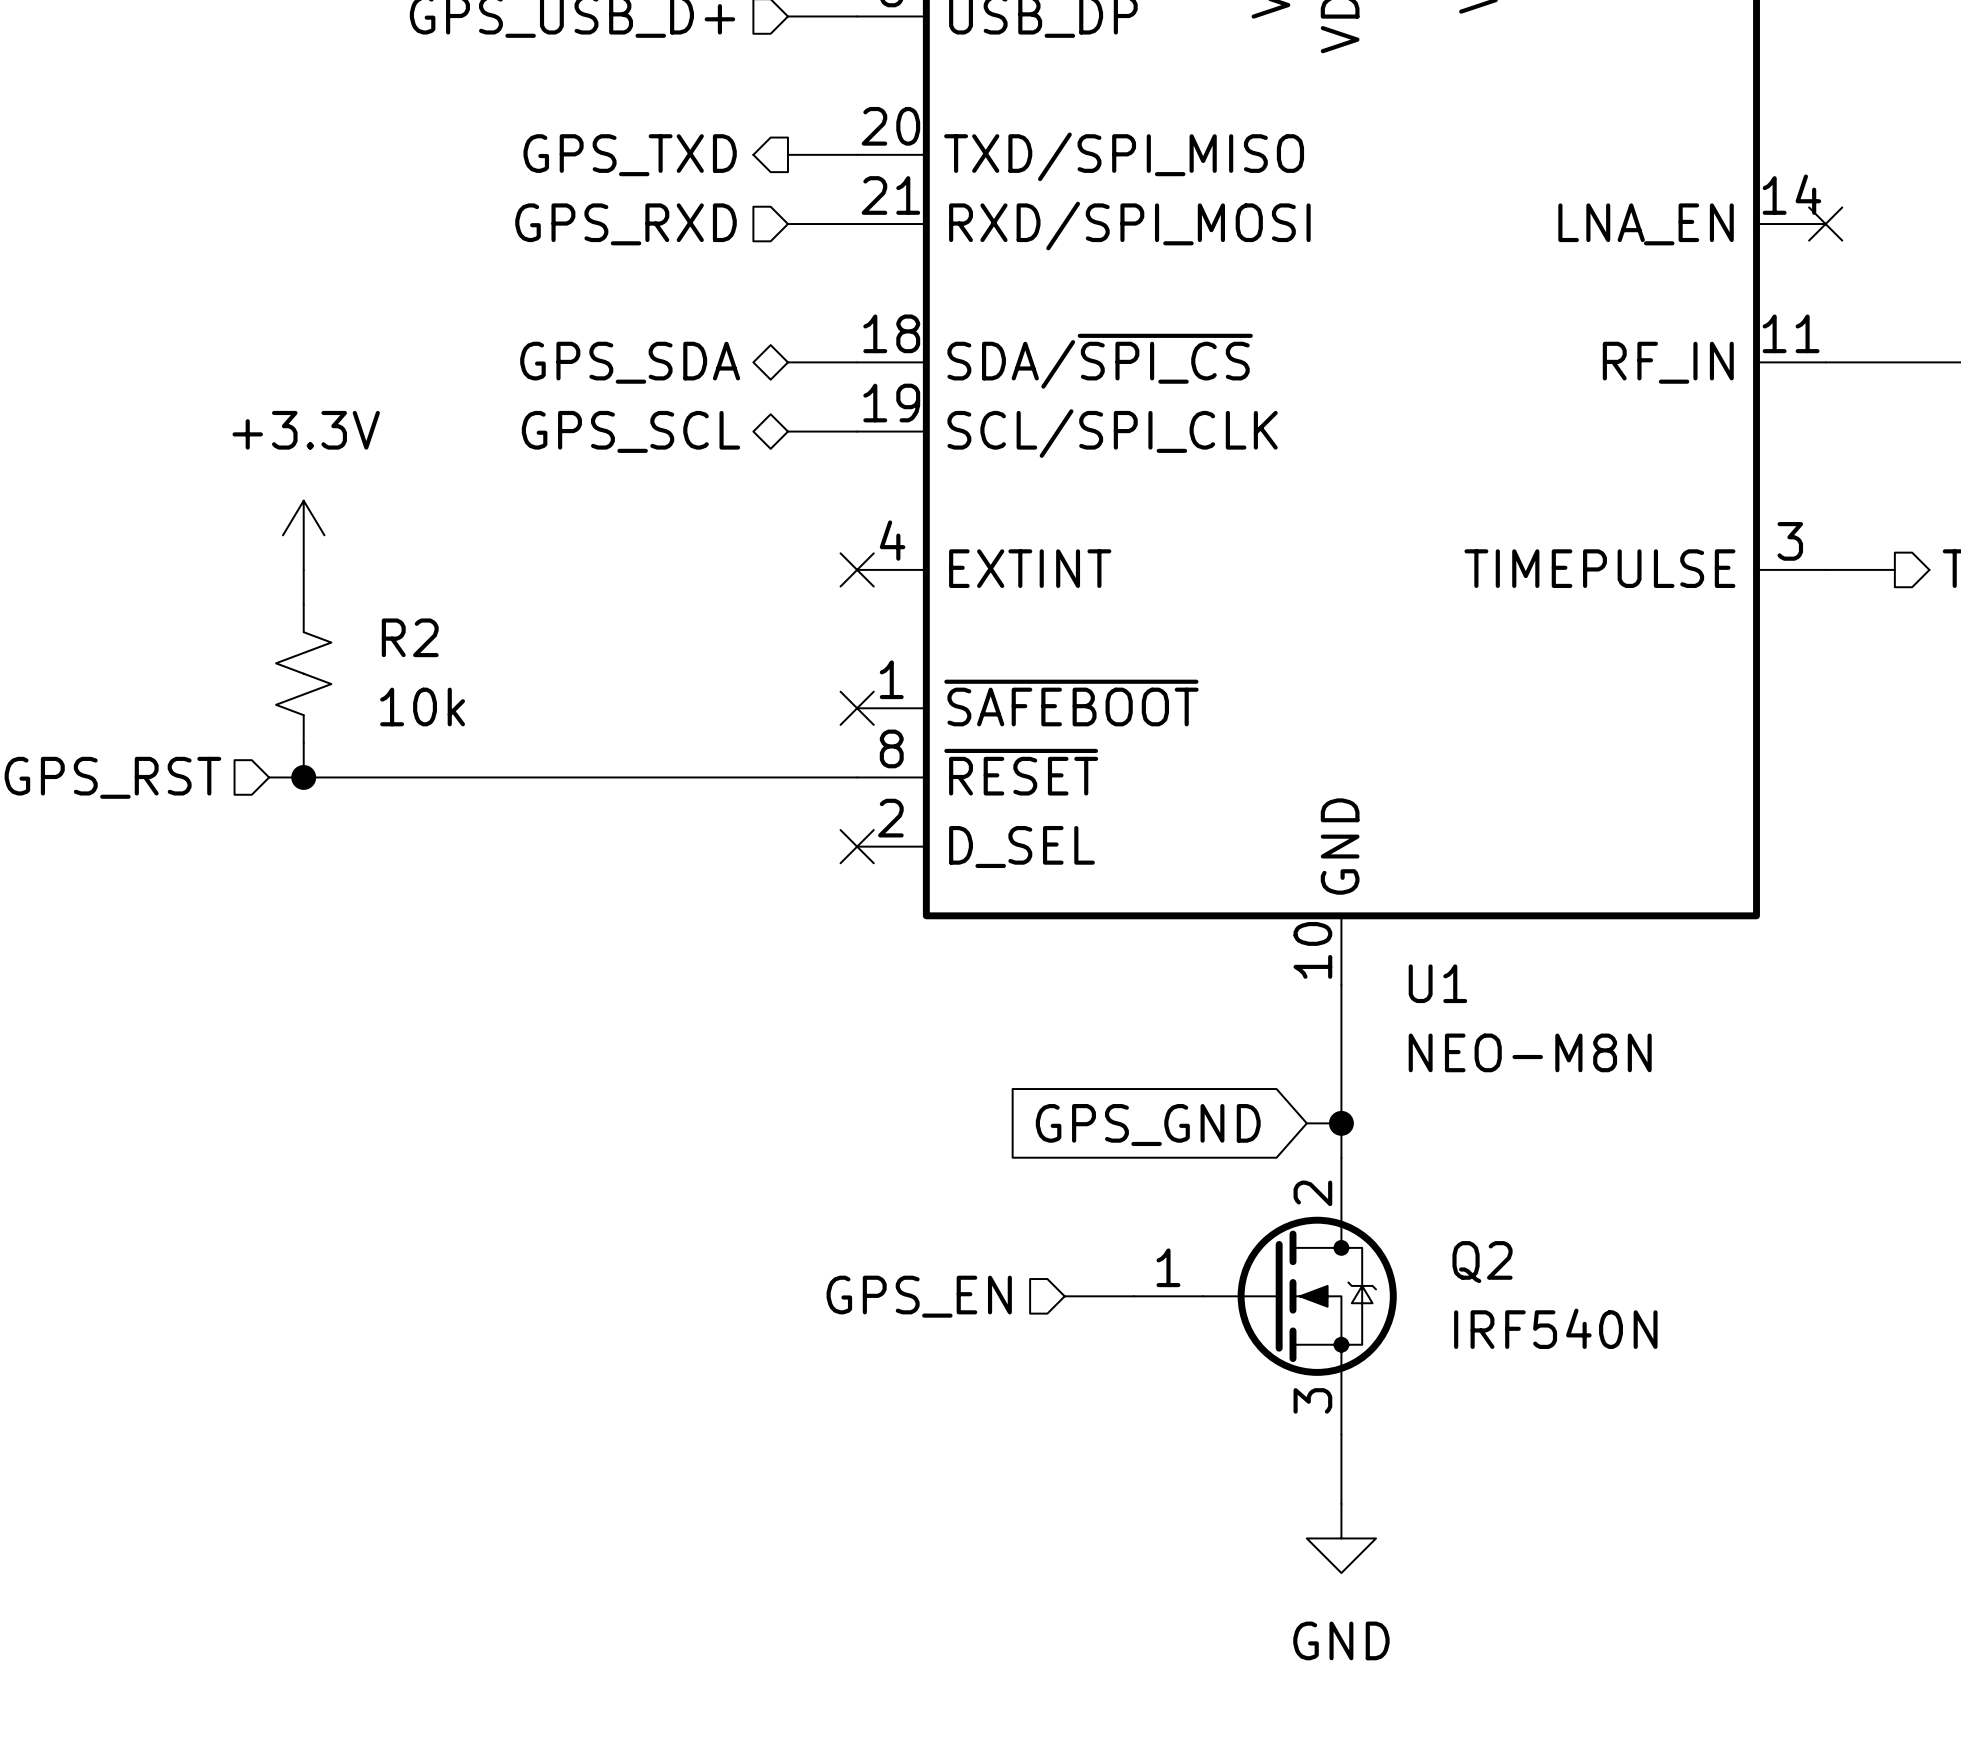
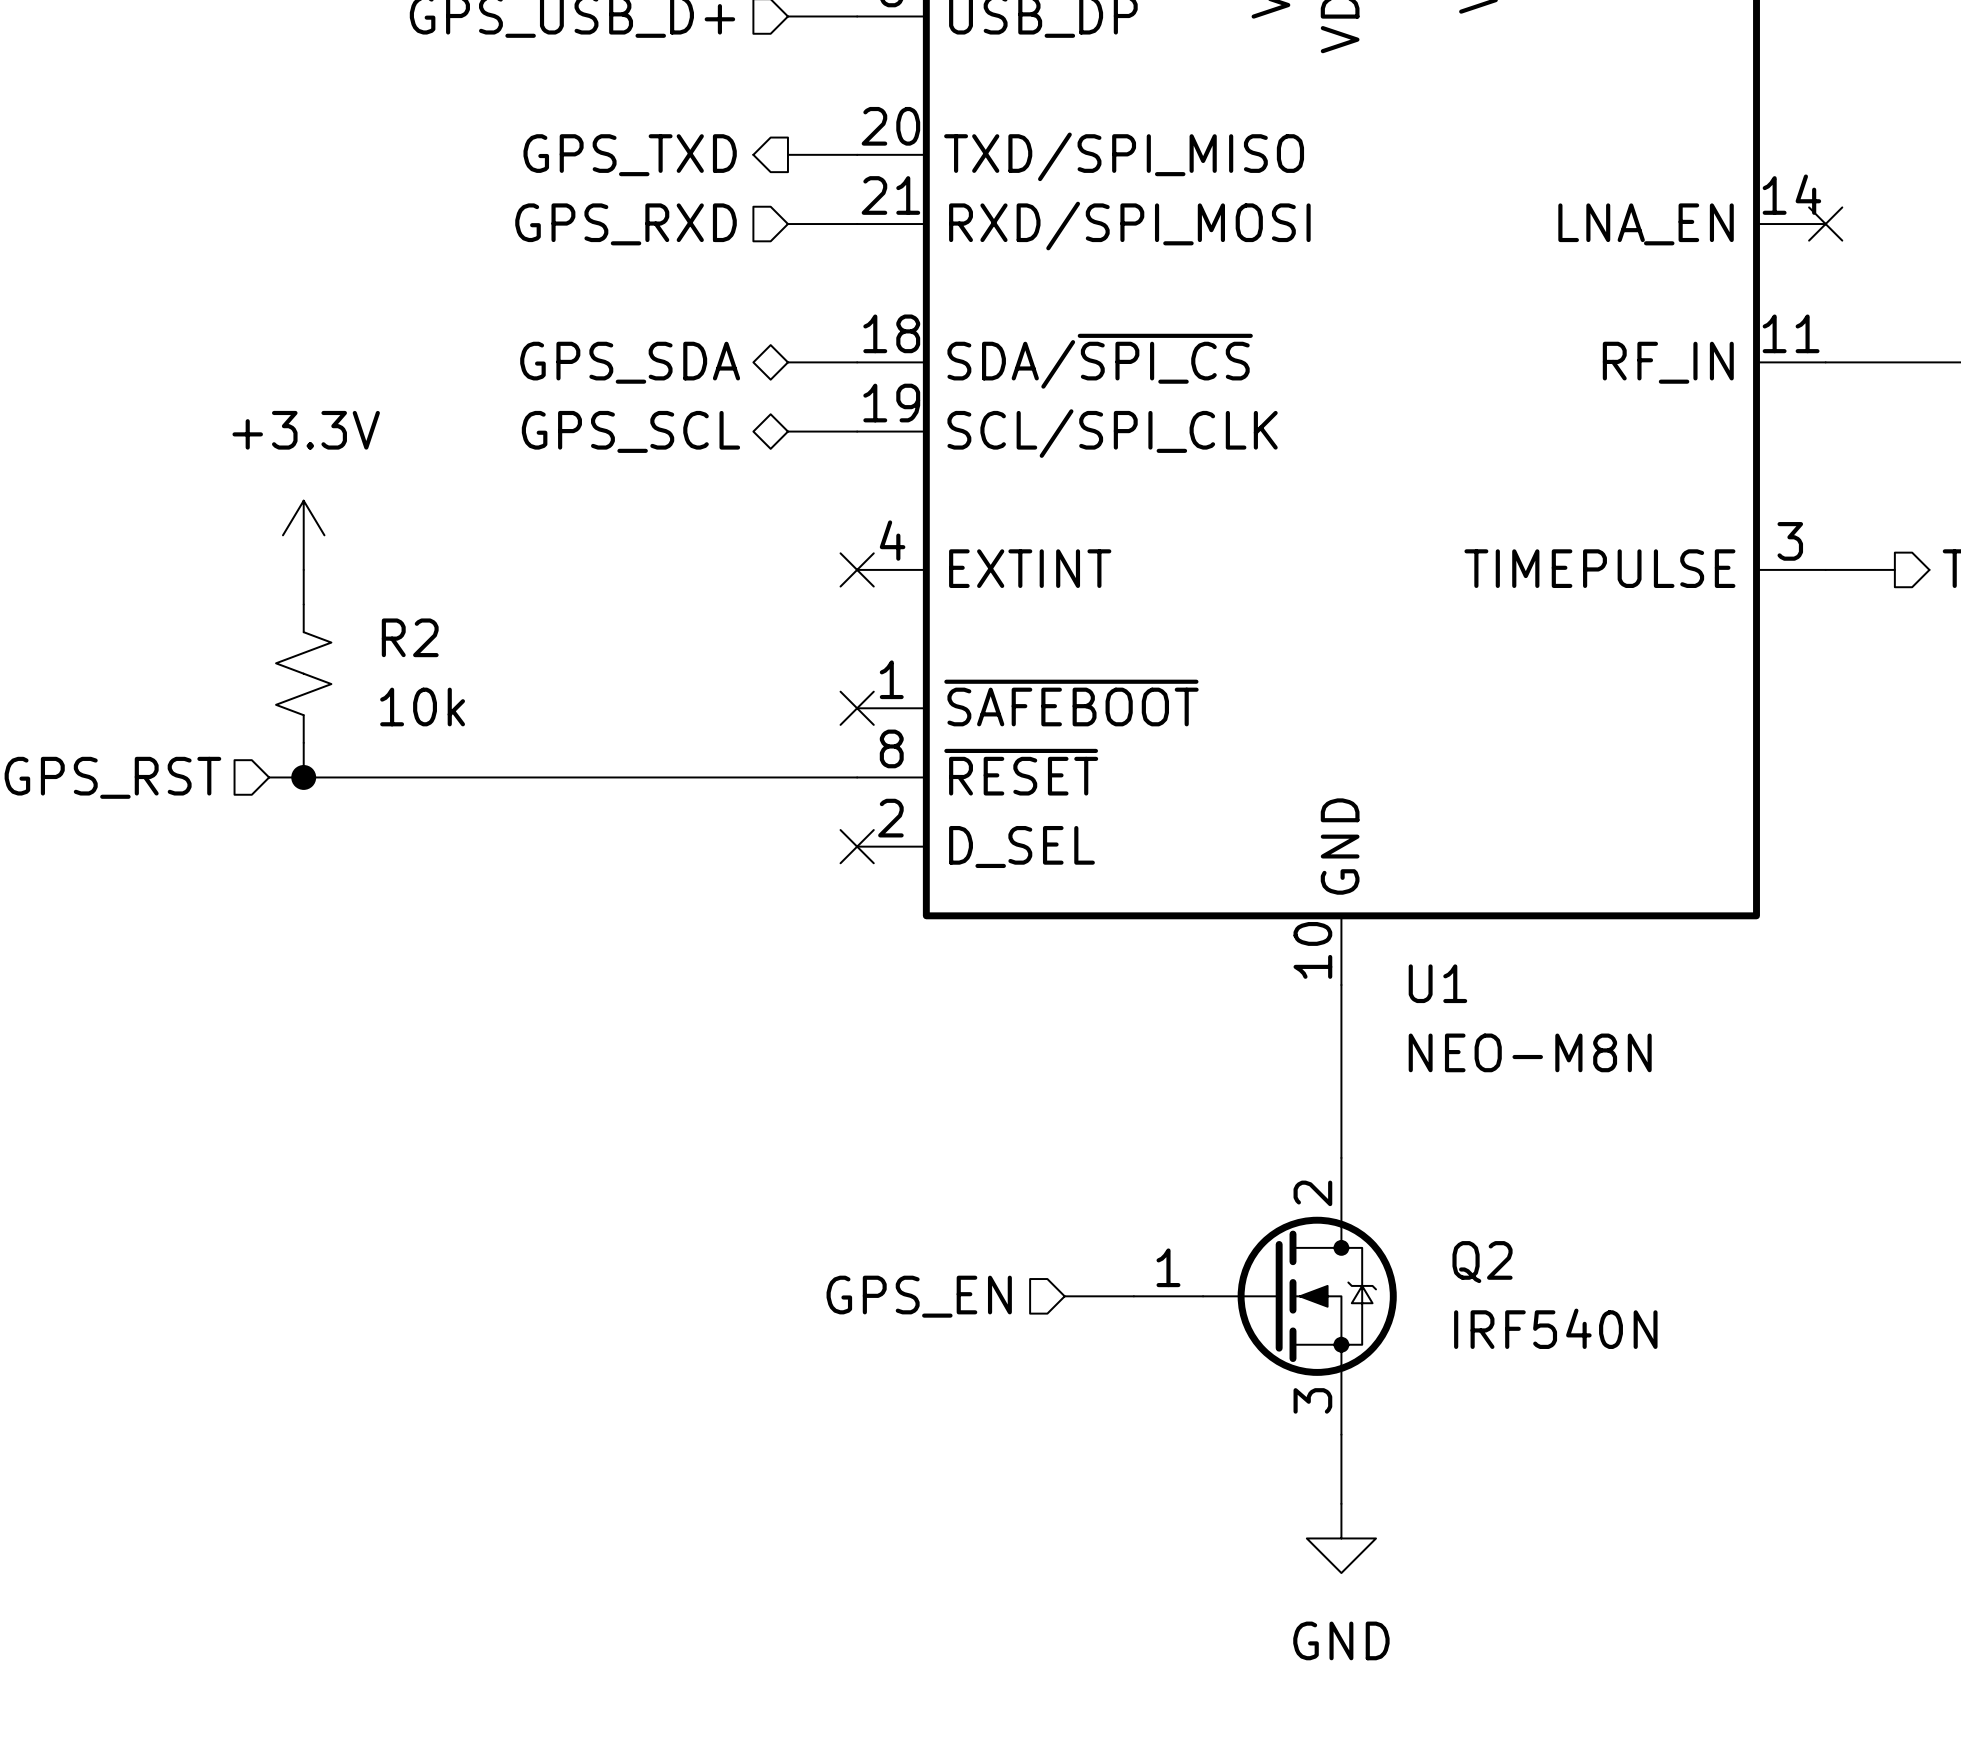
wire: (1306, 1123) (1341, 1123) -> none
junction: (1341, 1123) -> none
global label: GPS_GND (1148, 1125) -> none

